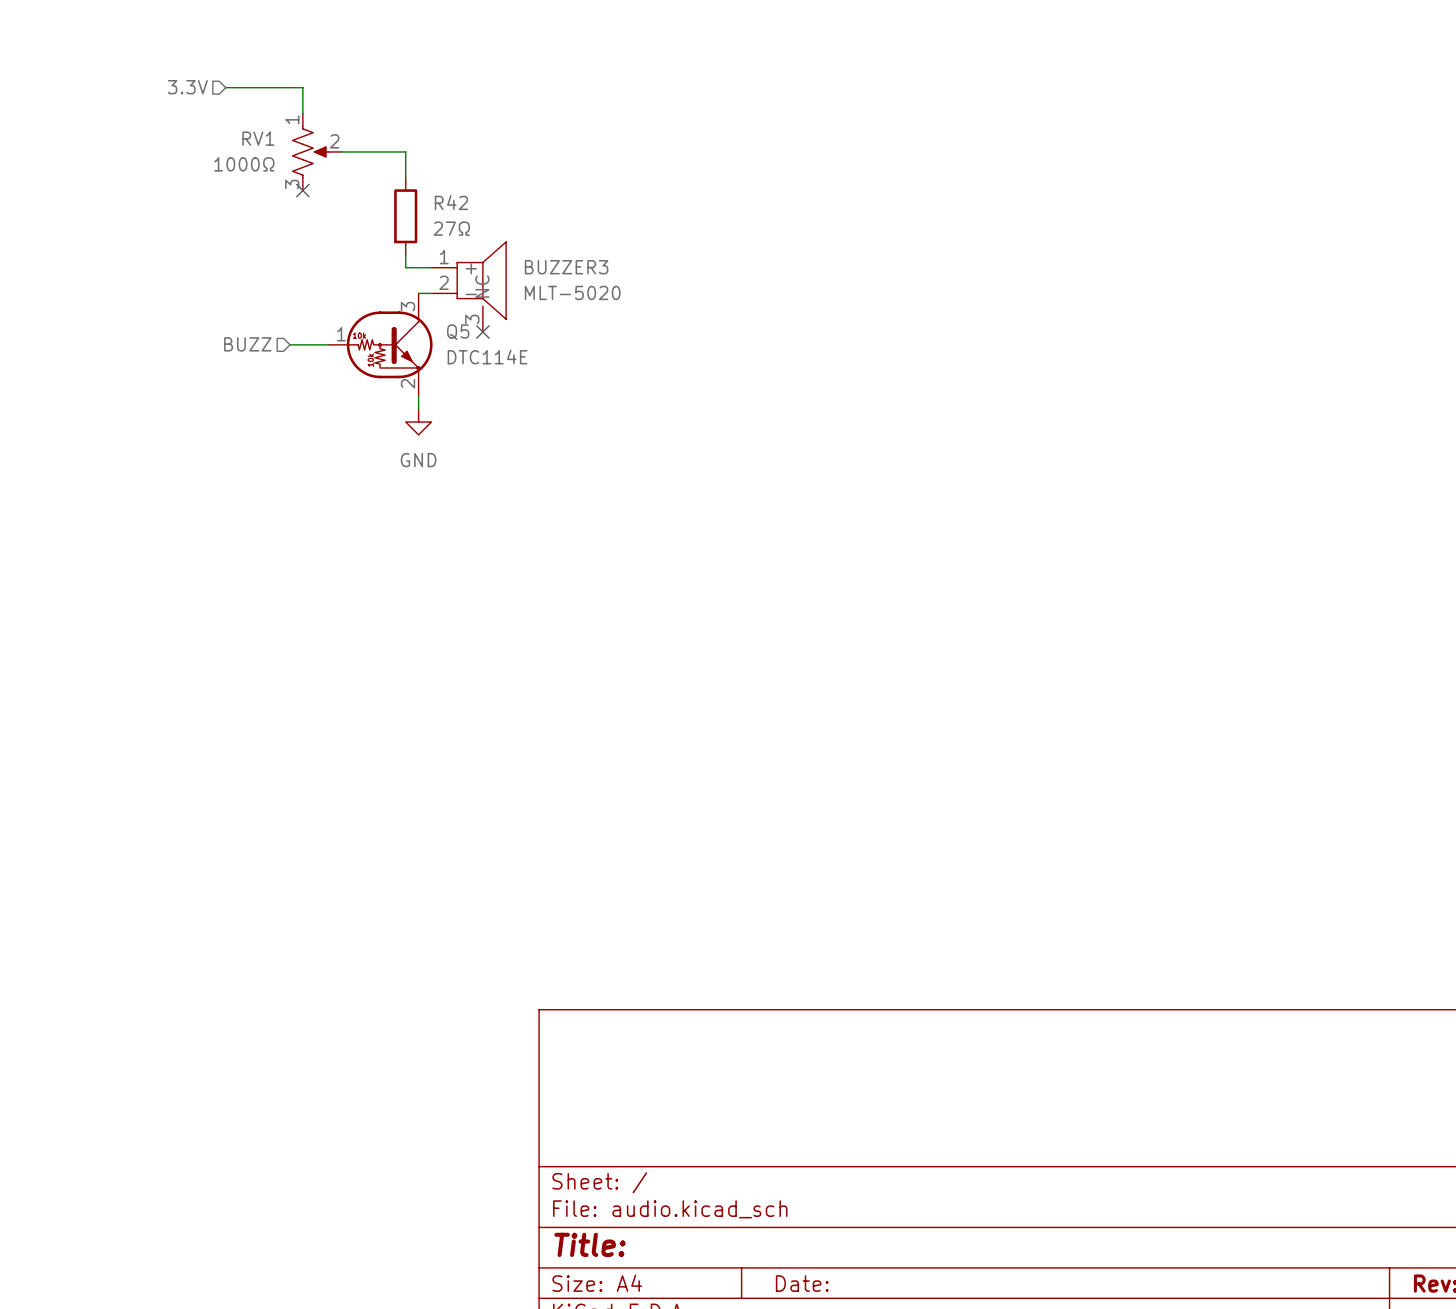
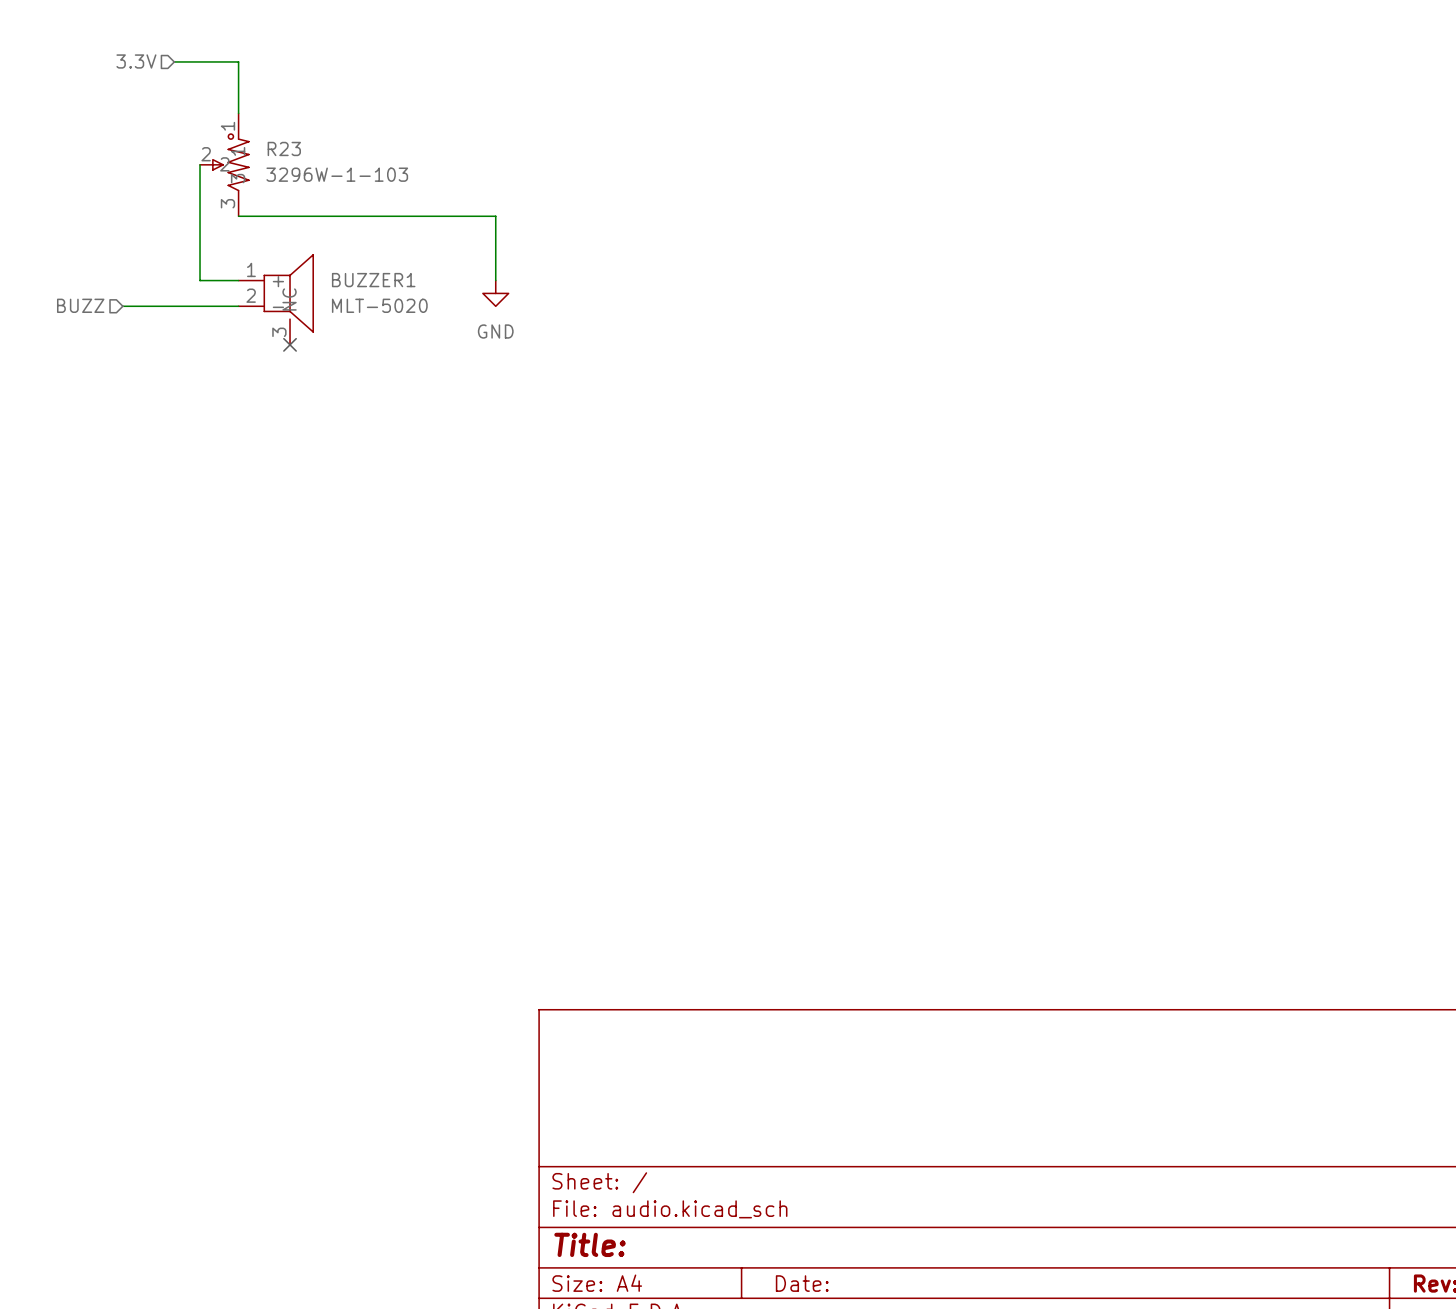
wire: none -> (174, 61) (238, 61) (238, 113)
hierarchical label position: 3.3V (187, 87) -> 3.3V (136, 61)
wire: (225, 87) (302, 87) (302, 113) -> none
RV1: 1000Ω (317, 151) -> none
wire: (341, 151) (405, 151) (405, 177) -> none
wire: none -> (200, 164) (200, 280) (238, 280)
R23: none -> 3296W-1-103 (224, 164)
no-connect mark: (302, 190) -> none
wire: none -> (238, 216) (495, 216) (495, 280)
R42: 27Ω (405, 216) -> none
wire: (405, 254) (405, 267) (431, 267) -> none
BUZZER3: MLT-5020 (468, 286) -> none
wire: (418, 293) (431, 293) -> none
BUZZER1: none -> MLT-5020 (275, 299)
wire: none -> (122, 306) (238, 306)
no-connect mark: (482, 332) -> none
hierarchical label position: BUZZ (247, 344) -> BUZZ (80, 305)
wire: (290, 344) (328, 344) -> none
no-connect mark: none -> (290, 344)
Q5: DTC114E (380, 344) -> none
wire: (418, 396) (418, 409) -> none
power symbol position: GND (418, 422) -> GND (495, 293)

